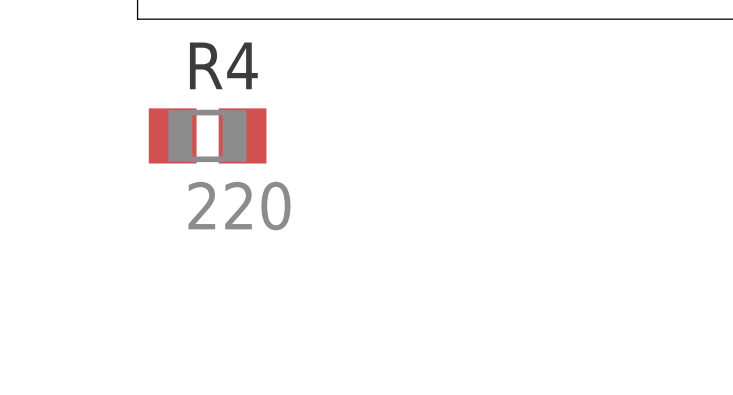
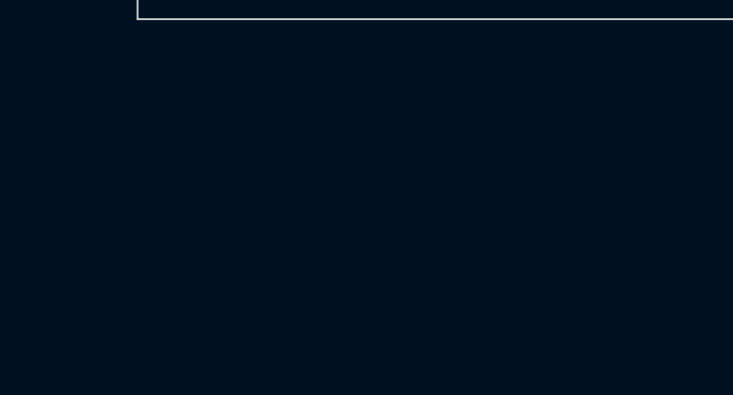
R4: 220 (207, 135) -> none

